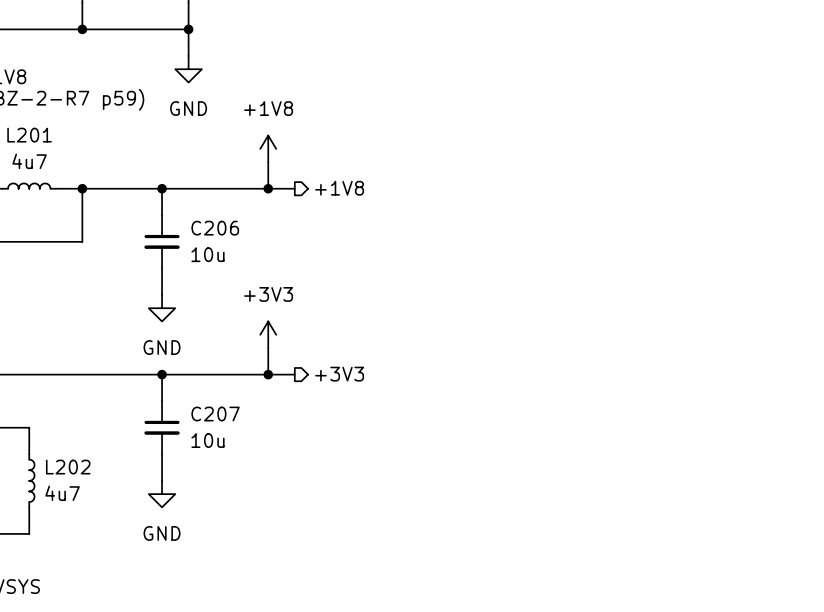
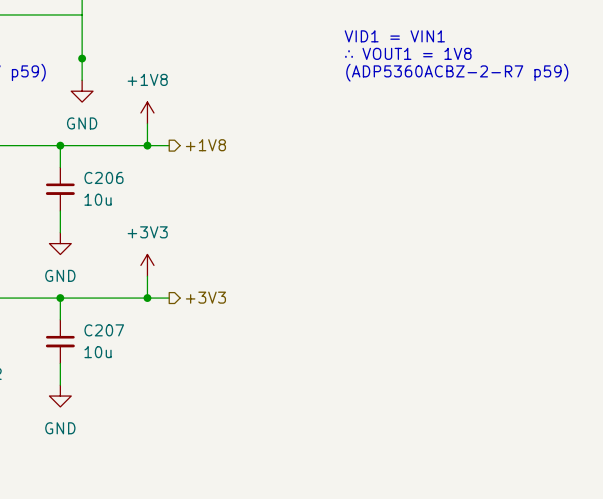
junction: (188, 29) -> none
wire: none -> (82, 36) (82, 80)
text: none -> VID1 = VIN1 (394, 36)
power symbol position: GND (188, 69) -> GND (82, 91)
text: none -> ∴ VOUT1 = 1V8 (408, 53)
junction: none -> (82, 58)
text: none -> (ADP5360ACBZ-2-R7 p59) (457, 72)

